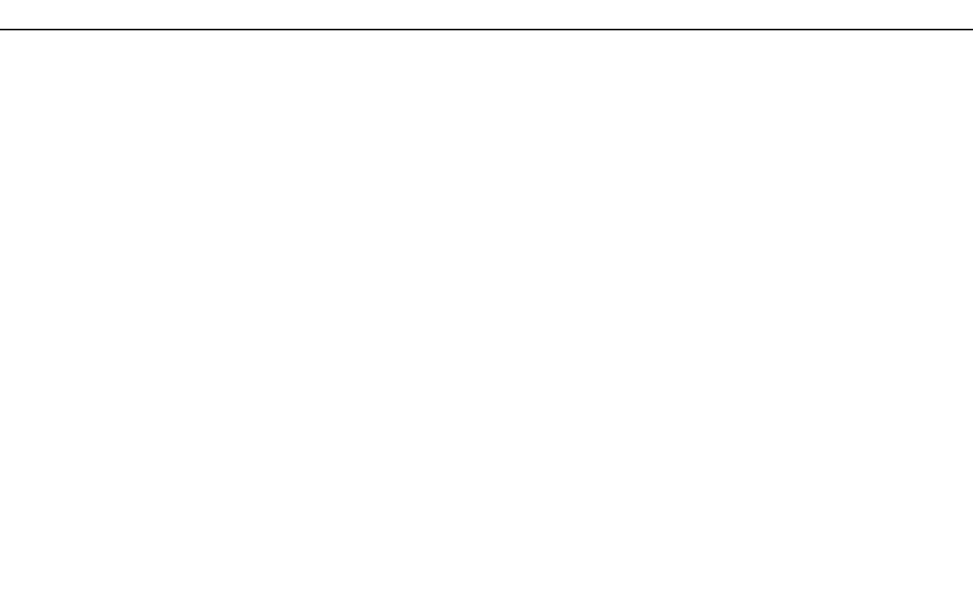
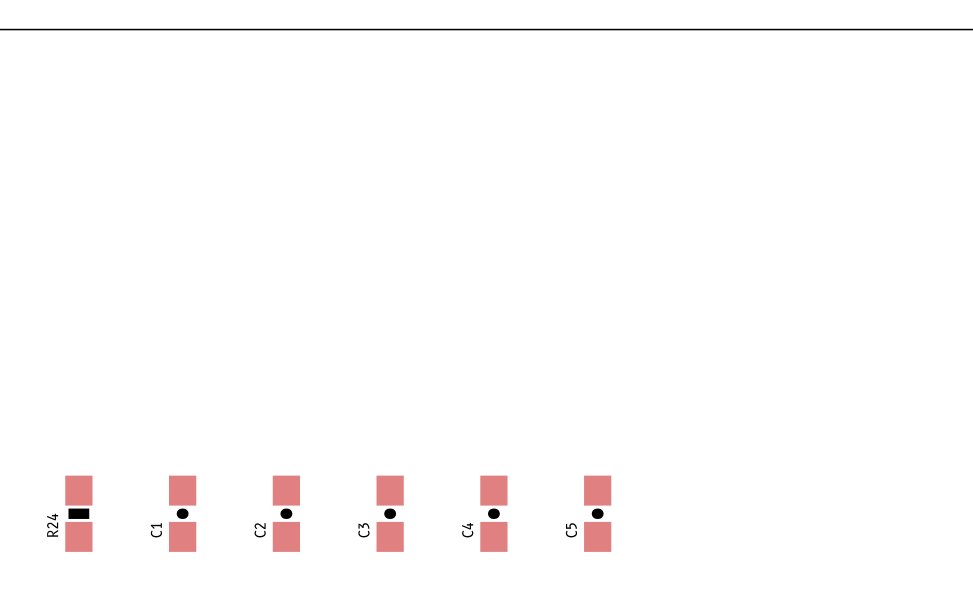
R24: none -> (78, 513)
C1: none -> (182, 513)
C2: none -> (286, 513)
C3: none -> (390, 513)
C4: none -> (493, 513)
C5: none -> (597, 513)

